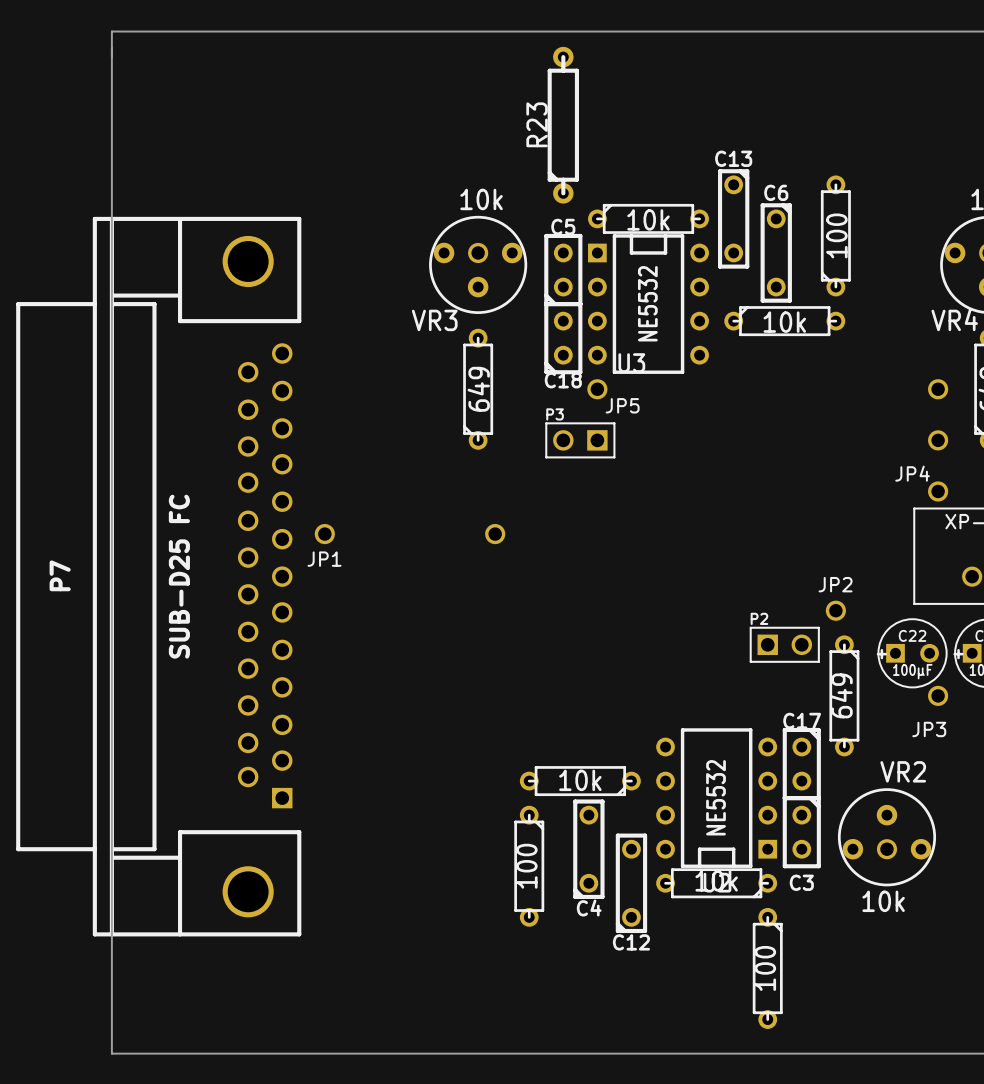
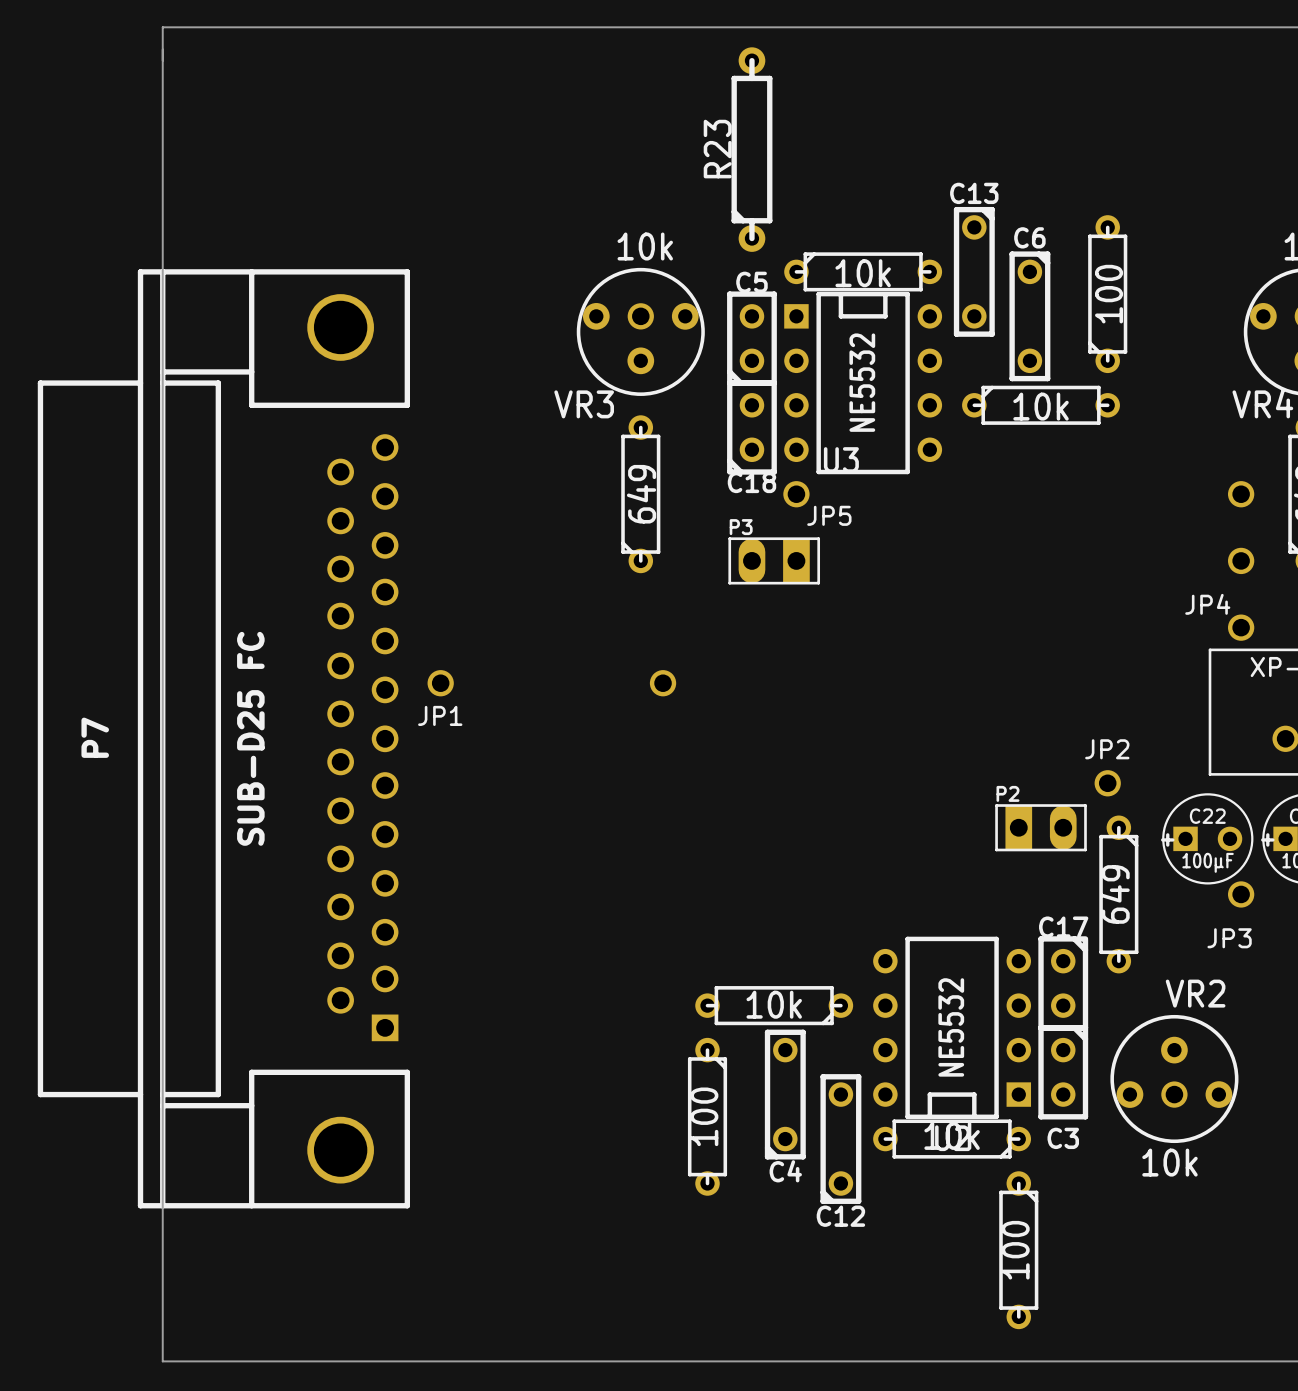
P3 footprint: [545, 422, 616, 459] -> [728, 537, 821, 585]
P2 footprint: [749, 626, 820, 663] -> [995, 804, 1087, 852]

